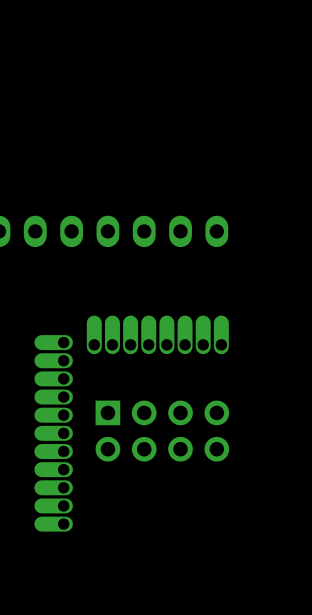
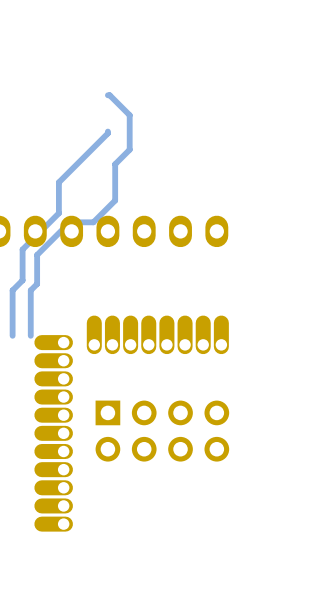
track: none -> (107, 95) (129, 115) (129, 149) (115, 164) (115, 200) (93, 222) (69, 222) (37, 255) (37, 284) (30, 290) (30, 335)
track: none -> (107, 131) (58, 182) (58, 213) (22, 249) (22, 280) (12, 290) (12, 335)

